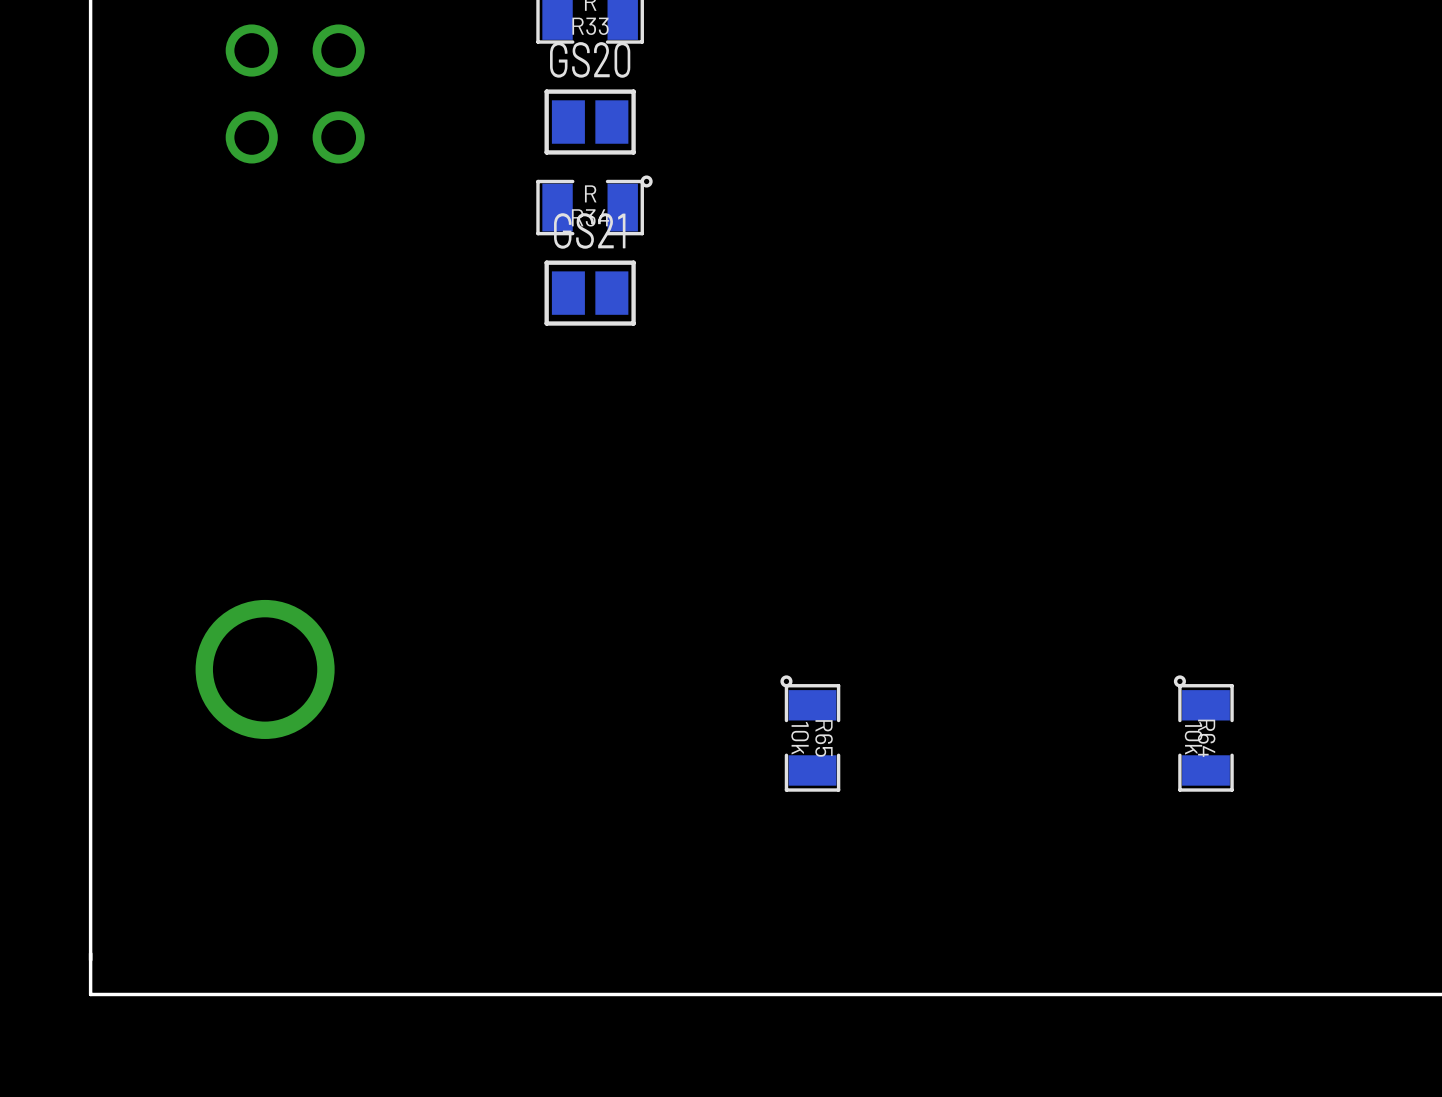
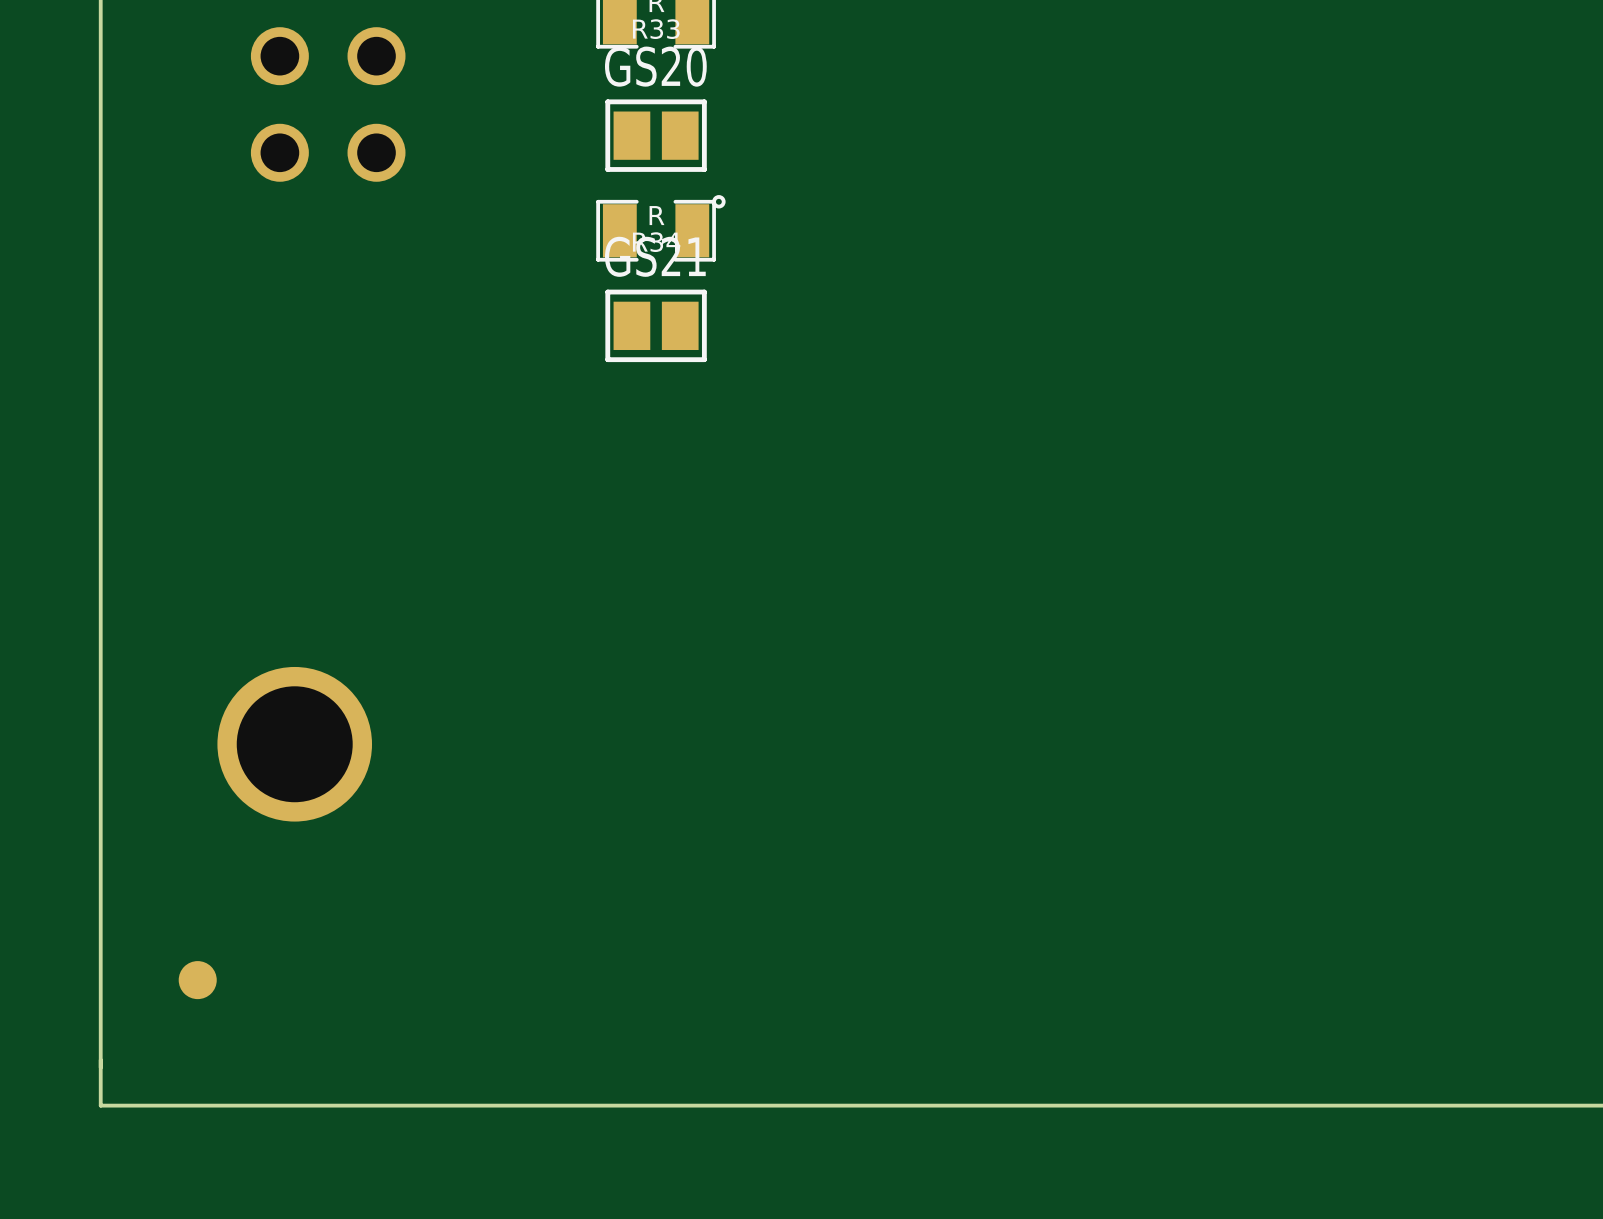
R65: 10k (810, 733) -> none
R64: 10k (1203, 733) -> none
part: none -> (197, 980)

